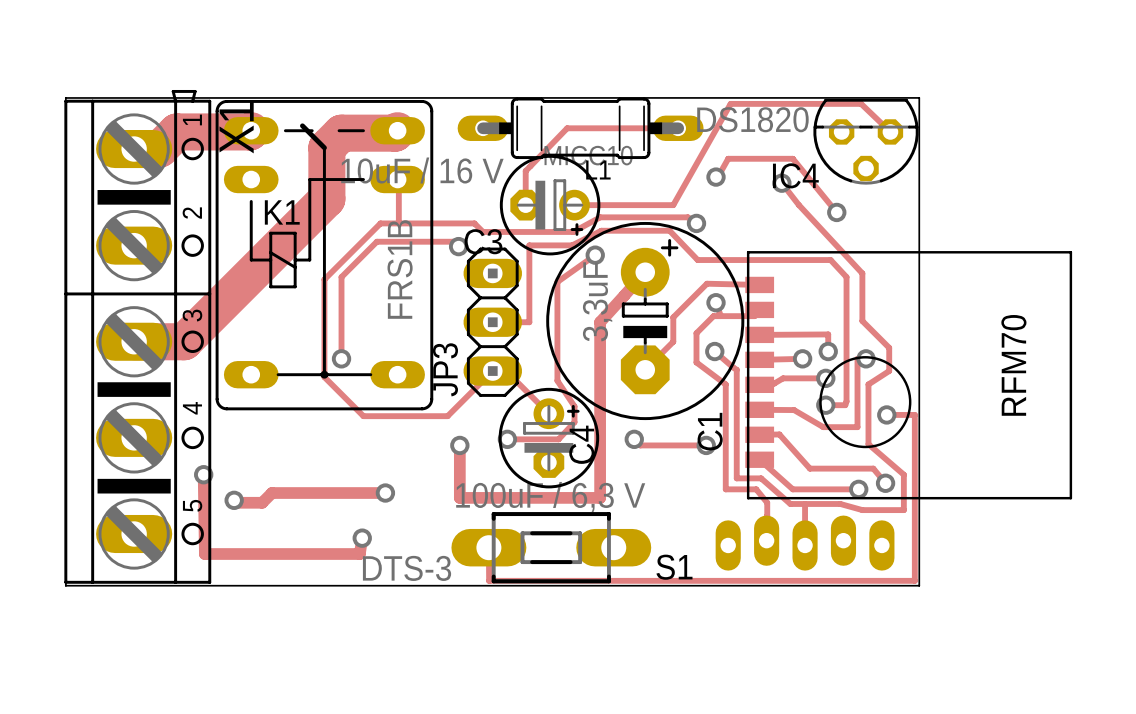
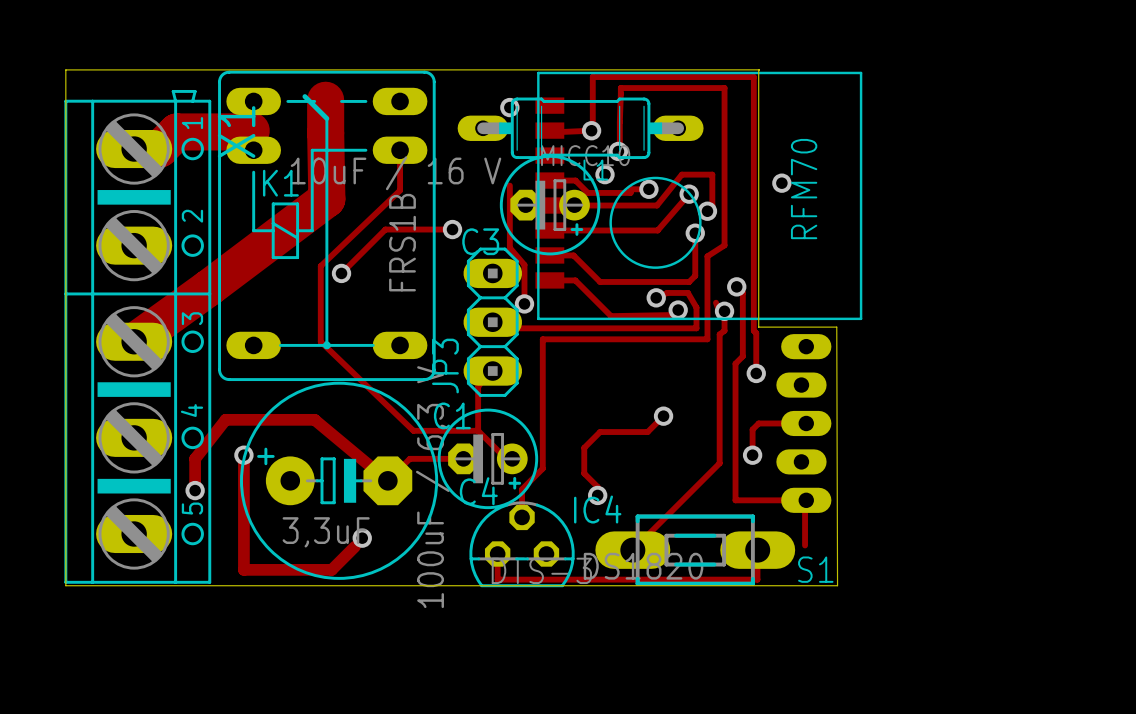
board edge: none -> (758, 69) (758, 327) (836, 327) (837, 585)
board edge: (65, 97) (919, 97) (919, 585) (837, 585) -> (65, 97) (65, 69) (759, 69)
via: none -> (509, 107)
track: (678, 128) (567, 128) (525, 170) (525, 205) -> none
track: (397, 130) (395, 133) (341, 133) (326, 147) (326, 199) (184, 341) (134, 341) -> (325, 100) (326, 199) (134, 341)
track: none -> (549, 130) (562, 131) (592, 129) (592, 77) (753, 77) (753, 330) (756, 333) (756, 373)
via: none -> (591, 130)
track: (890, 131) (861, 103) (730, 103) (673, 205) (574, 205) -> none
IC4 rotation: 0° (866, 141) -> 180° (522, 544)
IC4 position: (866, 141) -> (522, 544)
track: none -> (400, 150) (400, 190) (320, 266) (320, 341) (413, 430) (478, 430)
track: none -> (618, 151) (620, 88) (724, 88) (724, 245) (707, 256) (707, 339) (542, 339) (542, 468) (522, 489) (522, 517)
via: none -> (618, 151)
via: none -> (605, 174)
track: (716, 177) (717, 178) (728, 158) (792, 158) (836, 212) -> none
via: (716, 177) -> none
track: (397, 179) (400, 223) -> none
track: none -> (549, 180) (575, 180) (587, 192) (630, 192) (630, 189) (648, 189)
track: (781, 183) (798, 205) (862, 273) (862, 321) (889, 347) (889, 371) (868, 384) (868, 444) (903, 474) (903, 510) (862, 510) (840, 503) (790, 503) (761, 478) (736, 478) (736, 369) (714, 351) -> none
track: none -> (509, 185) (509, 247) (524, 264) (524, 303)
via: none -> (648, 189)
track: none -> (689, 194) (657, 230) (549, 230)
via: none -> (689, 194)
track: none -> (549, 205) (657, 205) (681, 174) (712, 174) (712, 205) (707, 211)
via: none -> (707, 211)
K1 name position: K1 (282, 212) -> K1 (280, 183)
via: (836, 212) -> none
track: (696, 223) (687, 217) (600, 217) (573, 231) (483, 231) (474, 223) (380, 223) (324, 279) (324, 377) (363, 416) (447, 416) (492, 371) (506, 371) (548, 413) -> none
via: (696, 223) -> none
track: none -> (452, 229) (385, 229) (341, 273) (341, 277)
track: none -> (695, 233) (695, 275) (689, 281) (600, 281) (573, 255) (549, 255)
via: none -> (695, 233)
track: (458, 246) (452, 241) (376, 241) (341, 277) (341, 358) -> none
via position: (458, 246) -> (452, 229)
K1 position: (324, 255) -> (326, 225)
track: (595, 255) (557, 281) (557, 380) (574, 406) (574, 422) (558, 439) (507, 439) -> none
via: (595, 255) -> none
track: (645, 272) (600, 322) (600, 497) (459, 497) (459, 445) -> none
via: none -> (341, 273)
track: none -> (549, 280) (575, 280) (611, 316) (679, 314) (678, 310)
track: (759, 284) (706, 283) (673, 317) (673, 341) (645, 369) -> none
track: none -> (736, 286) (742, 292) (742, 356) (735, 363) (735, 500) (806, 500)
via: none -> (736, 286)
track: none -> (656, 297) (667, 292) (687, 292) (696, 307) (696, 328) (485, 328)
via: none -> (656, 297)
via position: (716, 302) -> (724, 311)
via: none -> (524, 303)
track: (759, 309) (754, 316) (713, 316) (696, 333) (696, 362) (725, 384) (725, 489) (756, 489) (767, 502) (766, 540) -> none
via: none -> (678, 310)
track: none -> (724, 311) (724, 330) (719, 334) (719, 463) (632, 550)
C1 rotation: 0° (645, 321) -> 90° counterclockwise (339, 480)
C1 position: (645, 321) -> (339, 480)
track: (492, 322) (529, 322) (529, 245) (572, 245) (601, 230) (669, 230) (697, 260) (830, 260) (846, 277) (846, 401) (845, 405) (825, 405) -> none
track: (759, 334) (828, 334) (828, 351) -> none
via: (714, 351) -> none
via: (828, 351) -> none
via: (341, 358) -> none
track: (802, 358) (759, 359) -> none
via: (802, 358) -> none
track: (866, 358) (857, 358) (857, 427) (823, 427) (794, 410) (759, 409) -> none
via: (866, 358) -> none
via: none -> (756, 373)
part position: (908, 375) -> (698, 195)
track: none -> (485, 377) (478, 386) (478, 430)
track: (825, 378) (783, 378) (774, 383) (759, 384) -> none
via: (825, 378) -> none
via: (825, 405) -> none
track: (886, 414) (914, 414) (914, 580) (489, 580) (488, 547) -> none
via: (886, 414) -> none
track: none -> (663, 416) (647, 432) (600, 432) (584, 447) (584, 473) (597, 486) (597, 495)
via: none -> (663, 416)
track: none -> (806, 423) (758, 423) (752, 429) (752, 455)
track: none -> (478, 430) (506, 458) (512, 458)
track: (759, 434) (779, 434) (809, 468) (873, 468) (885, 483) -> none
C4 rotation: 0° (548, 438) -> 90° clockwise (487, 458)
C4 position: (548, 438) -> (487, 458)
via: (507, 439) -> none
track: (634, 439) (640, 445) (706, 445) -> none
via: (634, 439) -> none
via: (459, 445) -> none
via: (706, 445) -> none
track: none -> (243, 455) (243, 569) (331, 569) (354, 546)
via: none -> (243, 455)
via: none -> (752, 455)
track: none -> (463, 458) (409, 458) (387, 480) (314, 419) (225, 419) (195, 458) (195, 490)
track: (759, 459) (792, 489) (858, 489) -> none
track: (203, 474) (204, 554) (359, 554) (362, 538) -> none
via position: (203, 474) -> (195, 490)
via: (885, 483) -> none
via: (858, 489) -> none
track: (385, 493) (271, 493) (262, 502) (236, 502) (234, 500) -> none
via: (385, 493) -> none
via: none -> (597, 495)
via: (234, 500) -> none
part rotation: 0° (805, 543) -> 90° counterclockwise (803, 423)
part position: (805, 543) -> (803, 423)
S1 position: (551, 547) -> (695, 550)
track: none -> (757, 550) (757, 579) (497, 579) (497, 554)

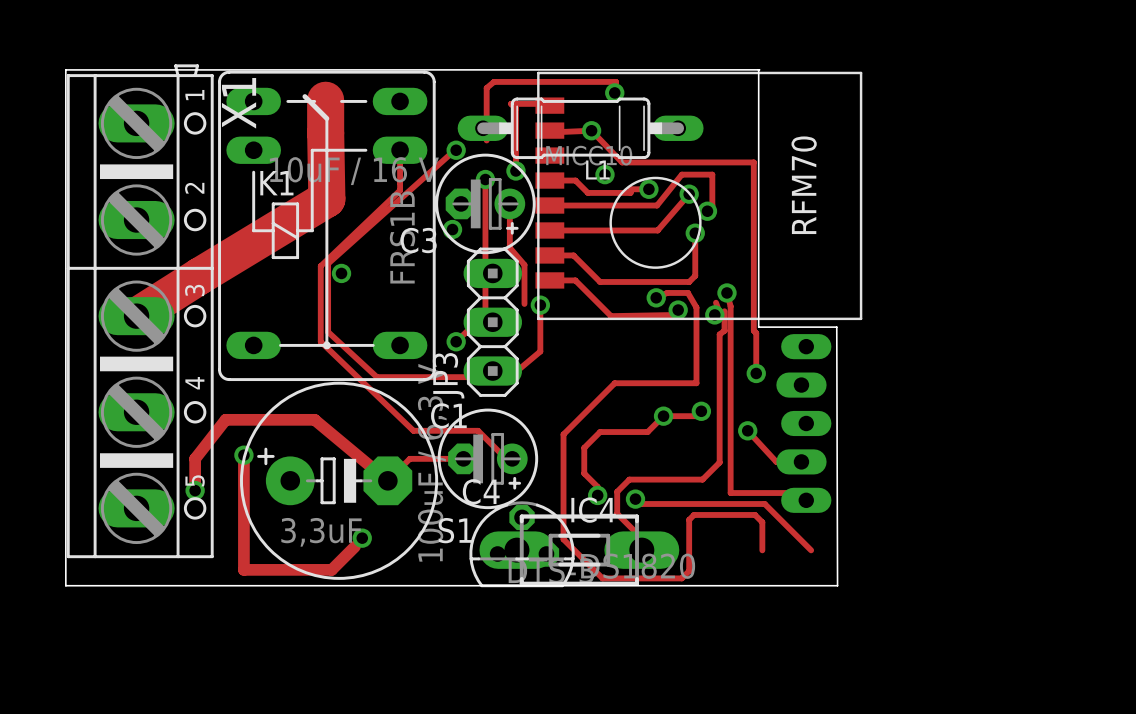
track: none -> (614, 92) (615, 81) (493, 81) (486, 88) (486, 140)
via: none -> (614, 92)
track: none -> (549, 105) (548, 103) (511, 103) (515, 108) (515, 170)
via: (509, 107) -> none
track: (251, 130) (176, 131) (159, 149) (134, 149) -> none
track: (591, 130) (592, 77) (753, 77) (753, 162) -> (591, 130) (622, 162) (753, 162)
track: none -> (456, 150) (328, 263) (328, 332) (376, 377) (509, 377) (540, 351) (540, 305)
via: none -> (456, 150)
track: (618, 151) (620, 88) (724, 88) (724, 245) (707, 256) (707, 339) (542, 339) (542, 468) (522, 489) (522, 517) -> none
via: (618, 151) -> none
via: none -> (515, 170)
track: none -> (485, 179) (485, 313) (456, 341)
via: none -> (485, 179)
via: (781, 183) -> none
track: (509, 185) (509, 203) -> none
track: (326, 199) (134, 341) -> (326, 199) (136, 316)
C3 position: (550, 205) -> (485, 203)
track: (452, 229) (385, 229) (341, 273) (341, 277) -> none
track: (736, 286) (742, 292) (742, 356) (735, 363) (735, 500) (806, 500) -> (726, 292) (730, 306) (730, 493) (806, 493) (806, 500)
via: (736, 286) -> none
via: none -> (726, 292)
via position: (524, 303) -> (540, 305)
via: (724, 311) -> none
via: none -> (714, 314)
track: (485, 328) (696, 328) -> (762, 550) (762, 522) (755, 514) (694, 514) (689, 519) (689, 571) (681, 578) (602, 578) (563, 539) (563, 434) (614, 383) (696, 383) (696, 328)
X1 position: (137, 336) -> (140, 311)
via: none -> (456, 341)
track: (485, 377) (478, 386) (478, 430) -> none
track: none -> (701, 411) (696, 416) (663, 416)
via: none -> (701, 411)
track: (806, 423) (758, 423) (752, 429) (752, 455) -> none
track: none -> (747, 430) (776, 461) (801, 461)
via position: (752, 455) -> (747, 430)
track: (719, 462) (632, 550) -> (719, 462) (702, 479) (629, 479) (617, 491) (617, 513) (641, 538) (641, 550)
track: none -> (635, 499) (640, 503) (764, 503) (811, 550)
via: none -> (635, 499)
track: (805, 503) (805, 545) -> none
S1 position: (695, 550) -> (579, 550)
track: (757, 550) (757, 579) (497, 579) (497, 554) -> none
S1 name position: S1 (815, 569) -> S1 (455, 530)

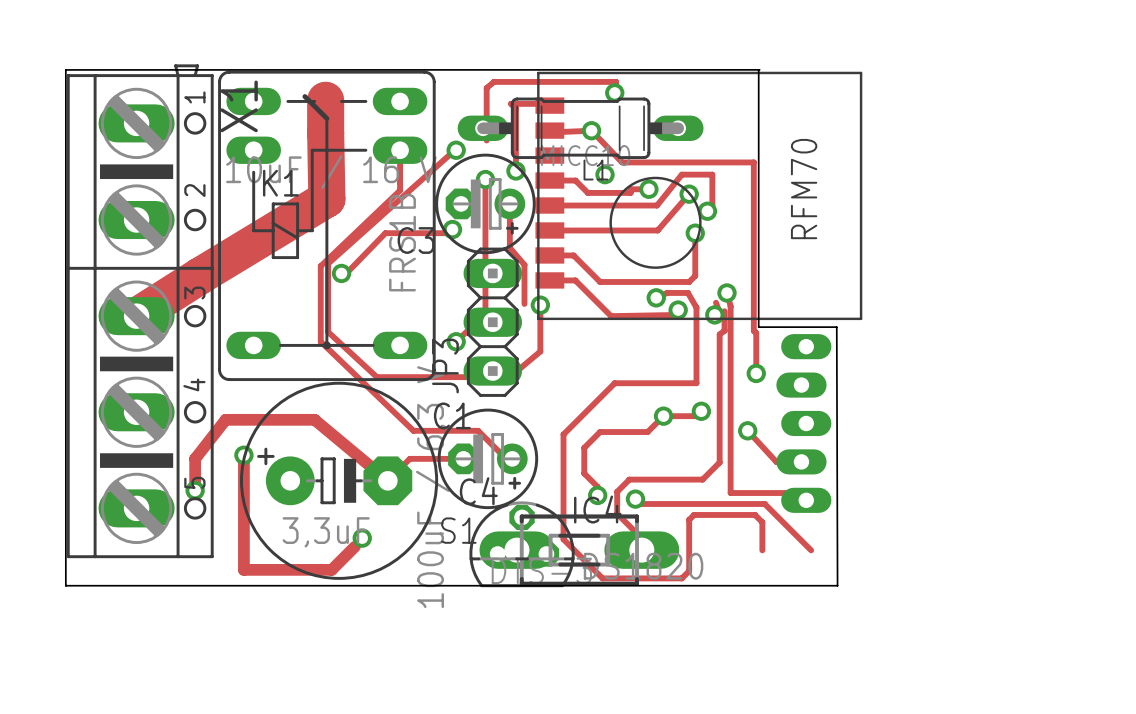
track: none -> (448, 233) (385, 233) (346, 273)

